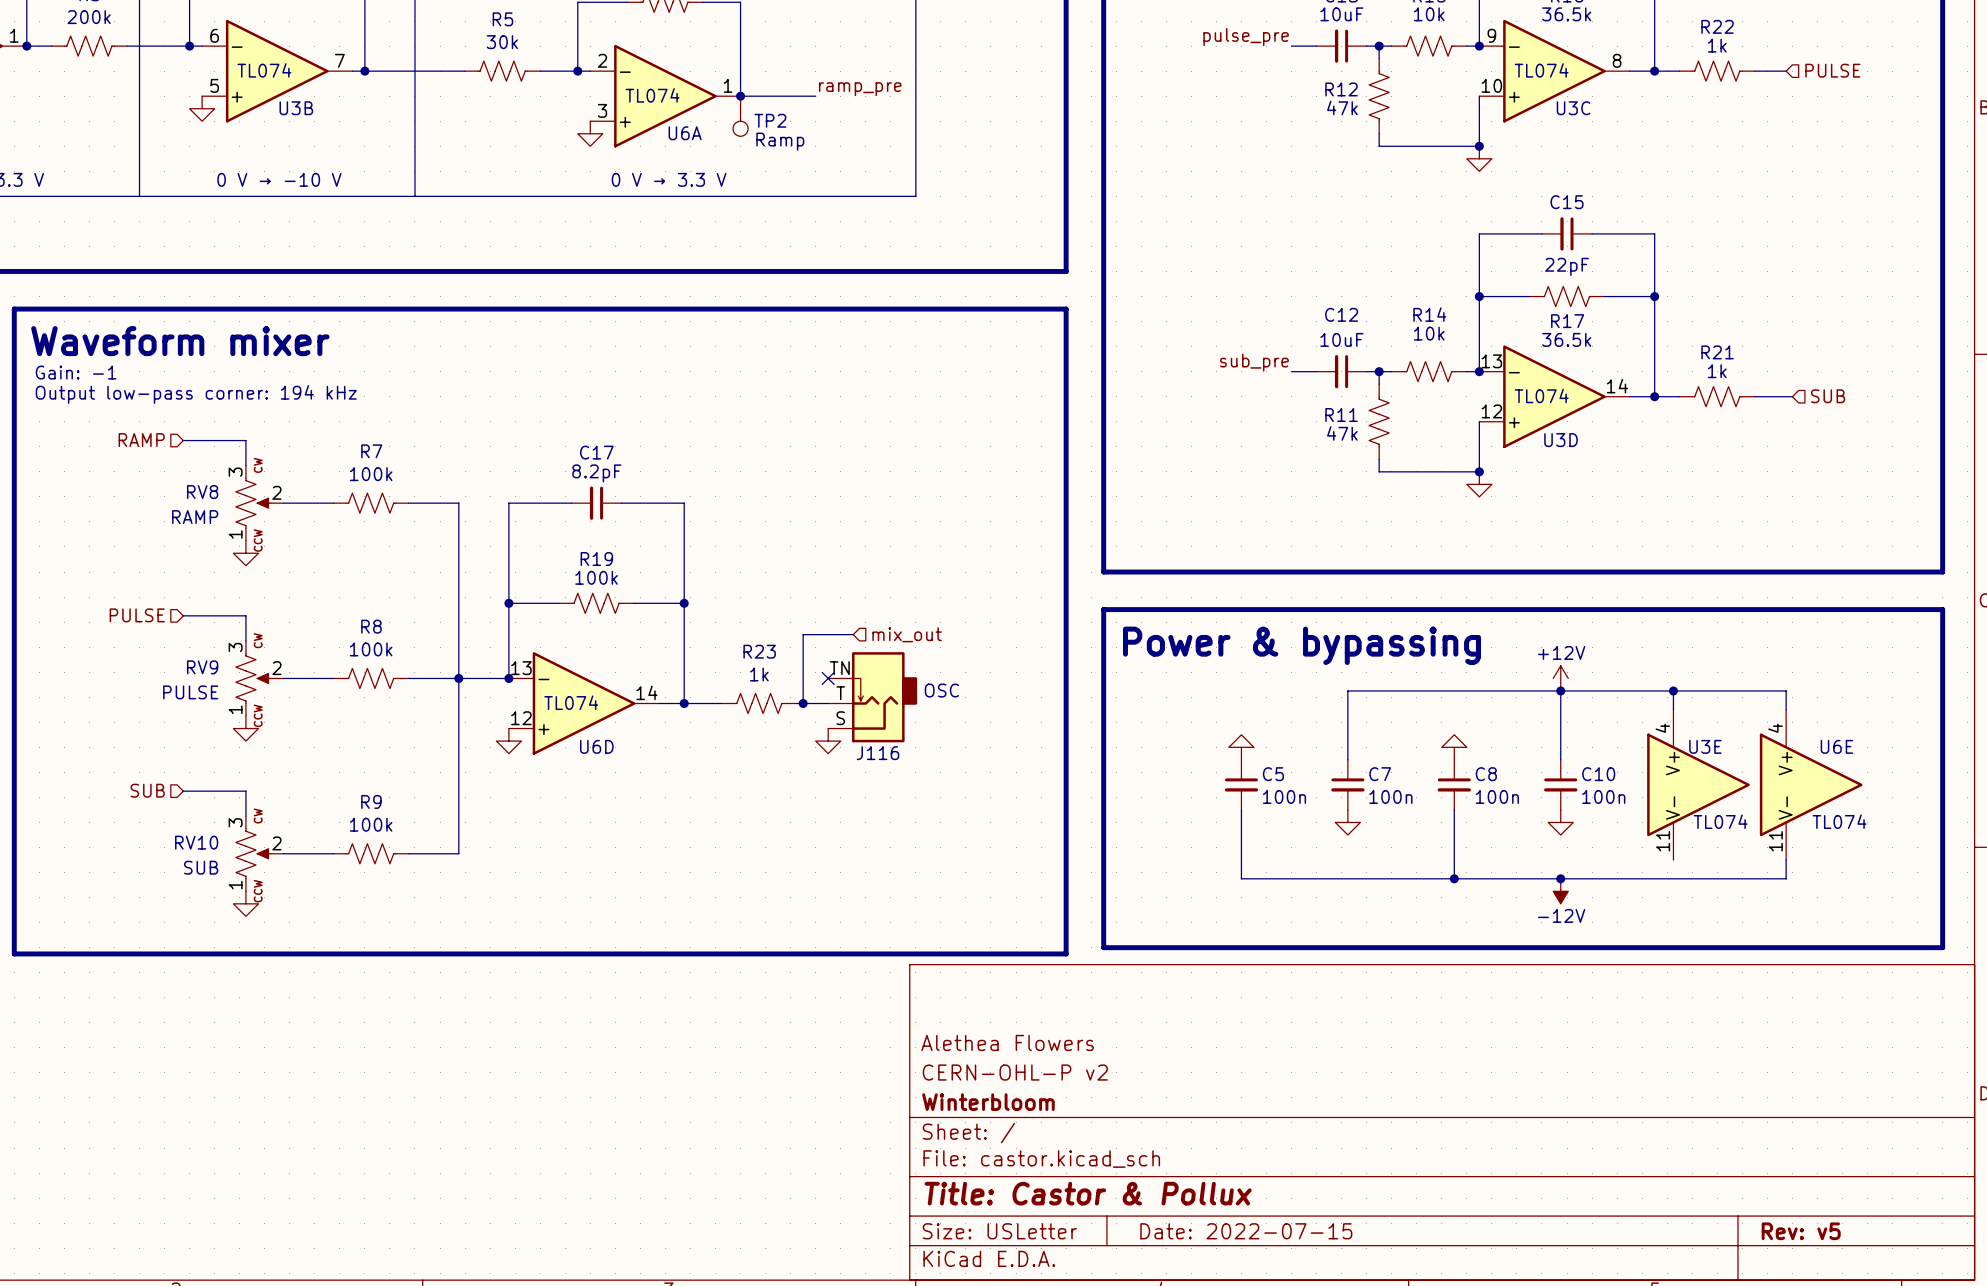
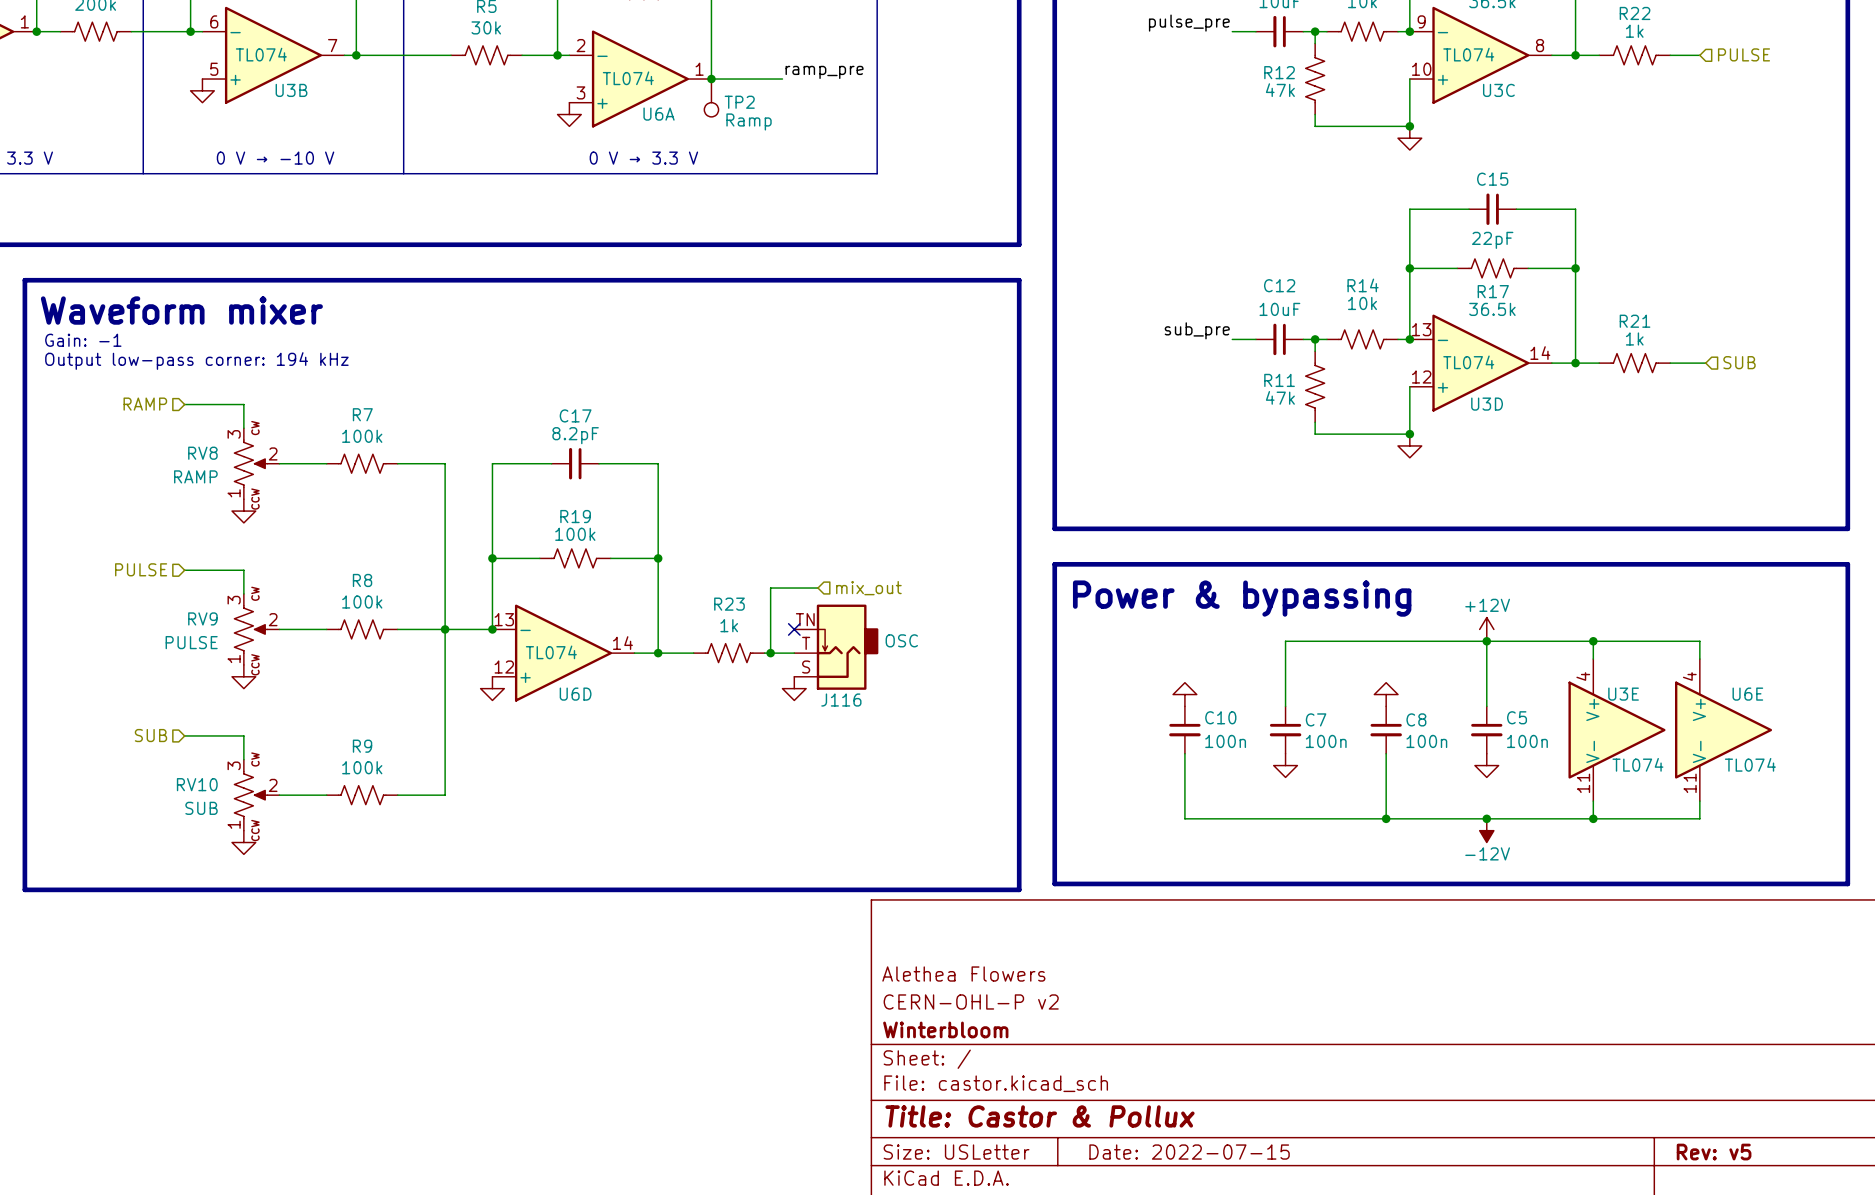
C5 name: C5 (1273, 774) -> C10 (1220, 717)
C10 name: C10 (1598, 774) -> C5 (1517, 717)
wire: none -> (1593, 801) (1593, 818)
junction: none -> (1593, 818)

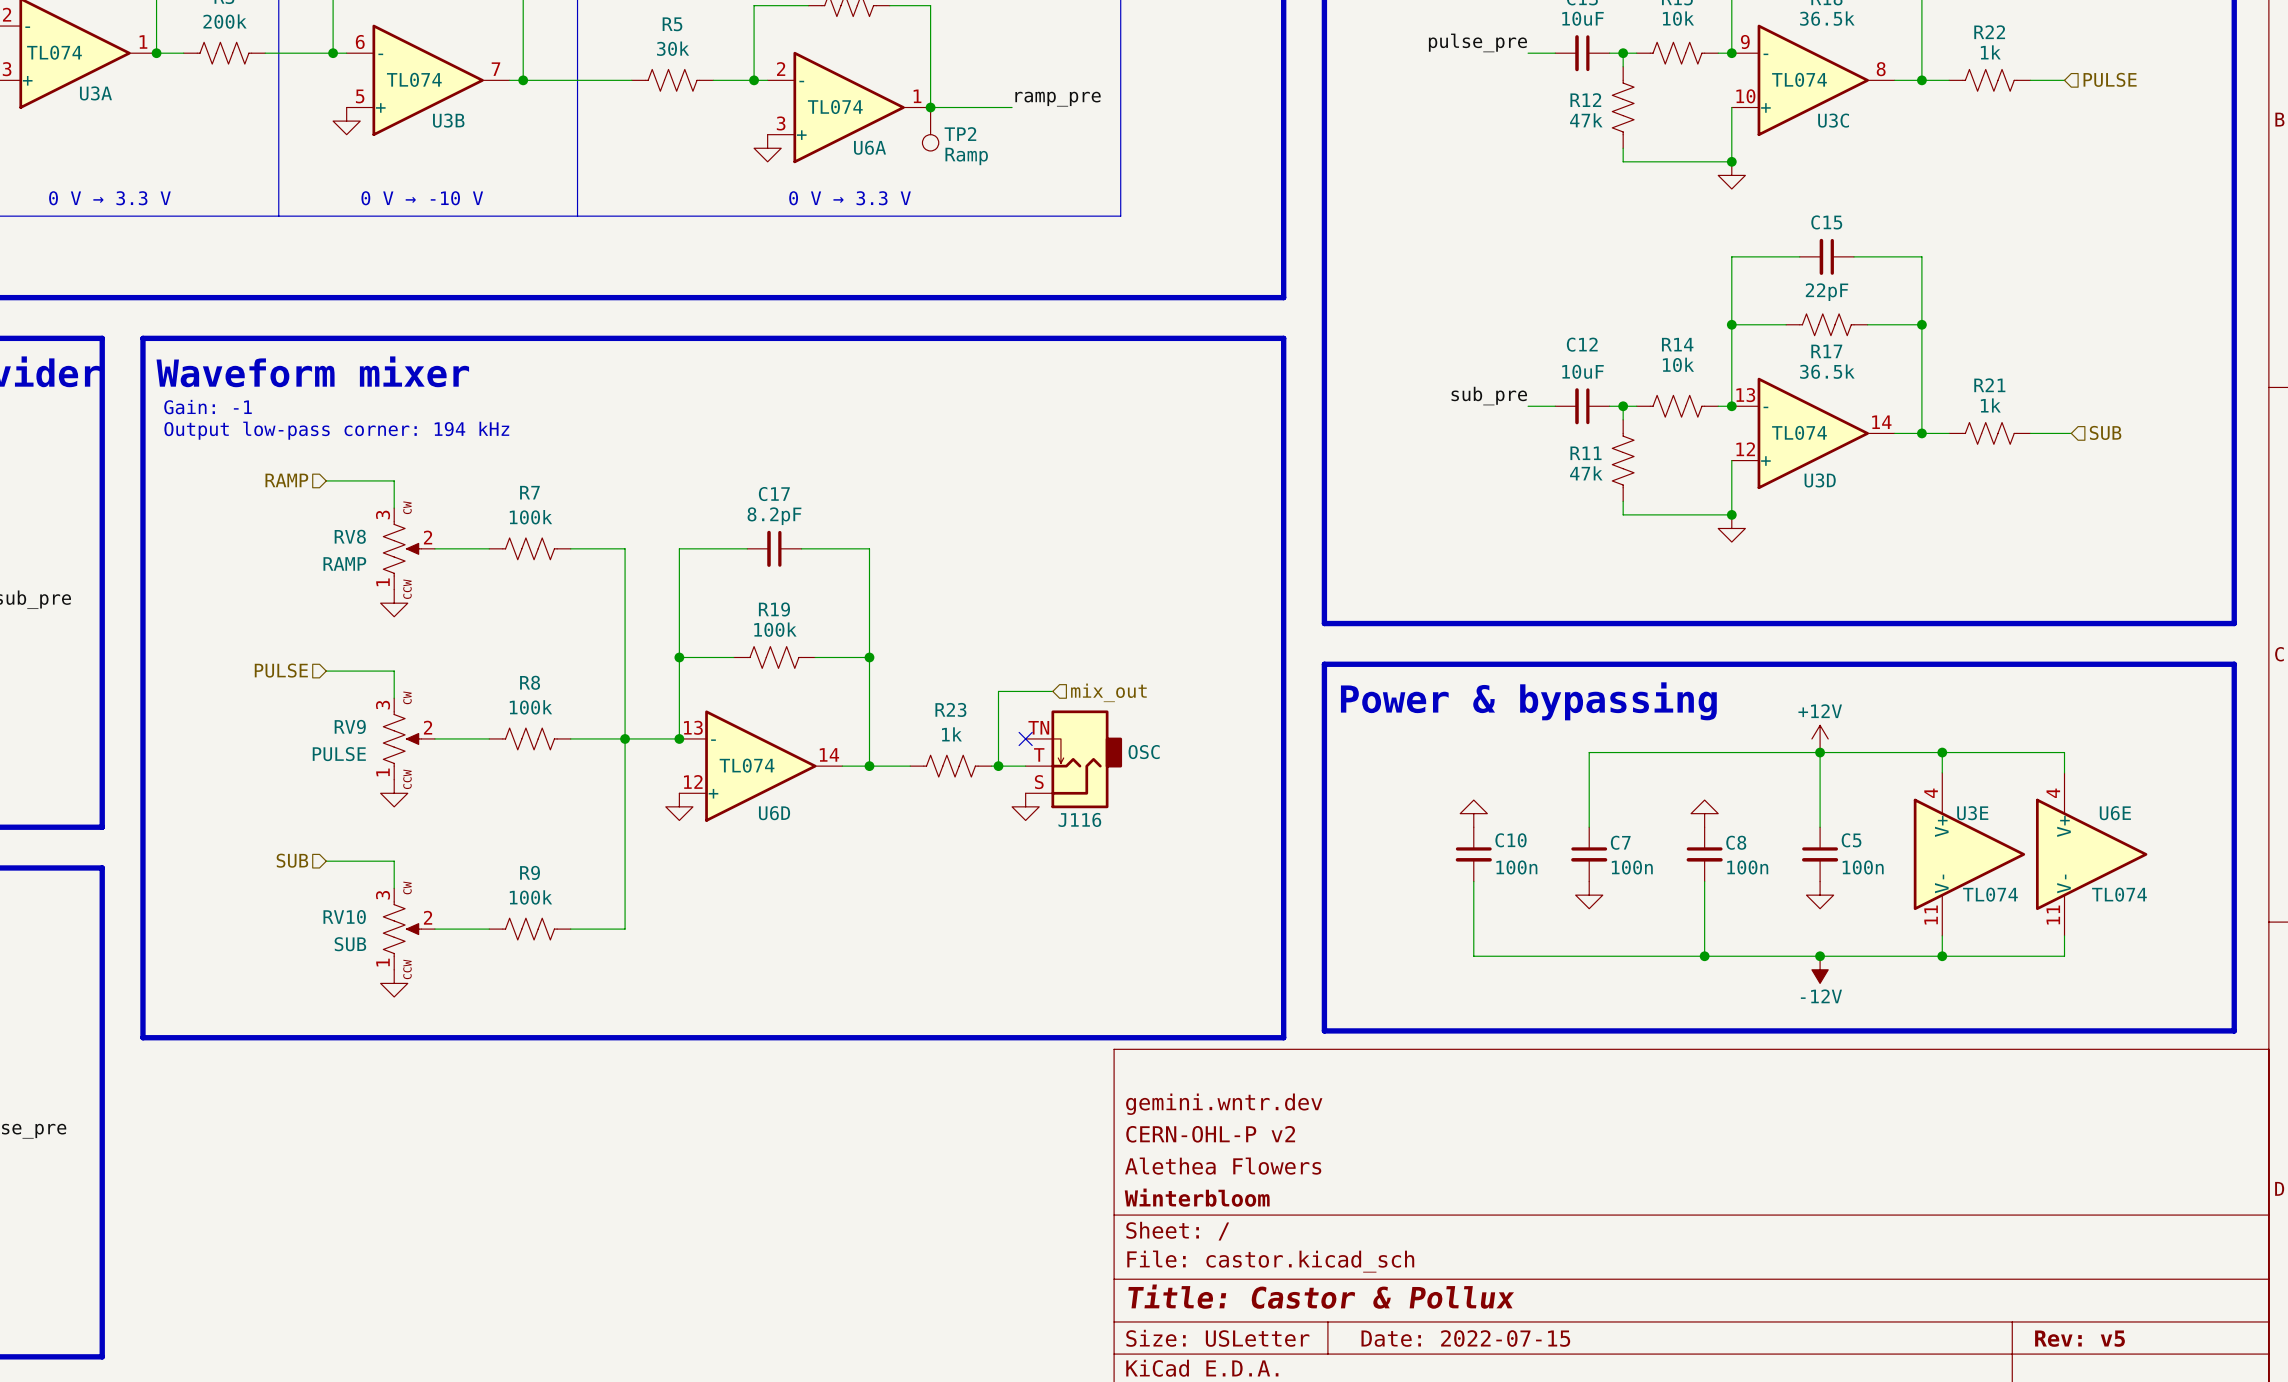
title block: none -> gemini.wntr.dev (1224, 1104)
title block: Alethea Flowers (963, 974) -> CERN-OHL-P v2 (1210, 1134)
title block: CERN-OHL-P v2 (971, 1001) -> Alethea Flowers (1223, 1166)

